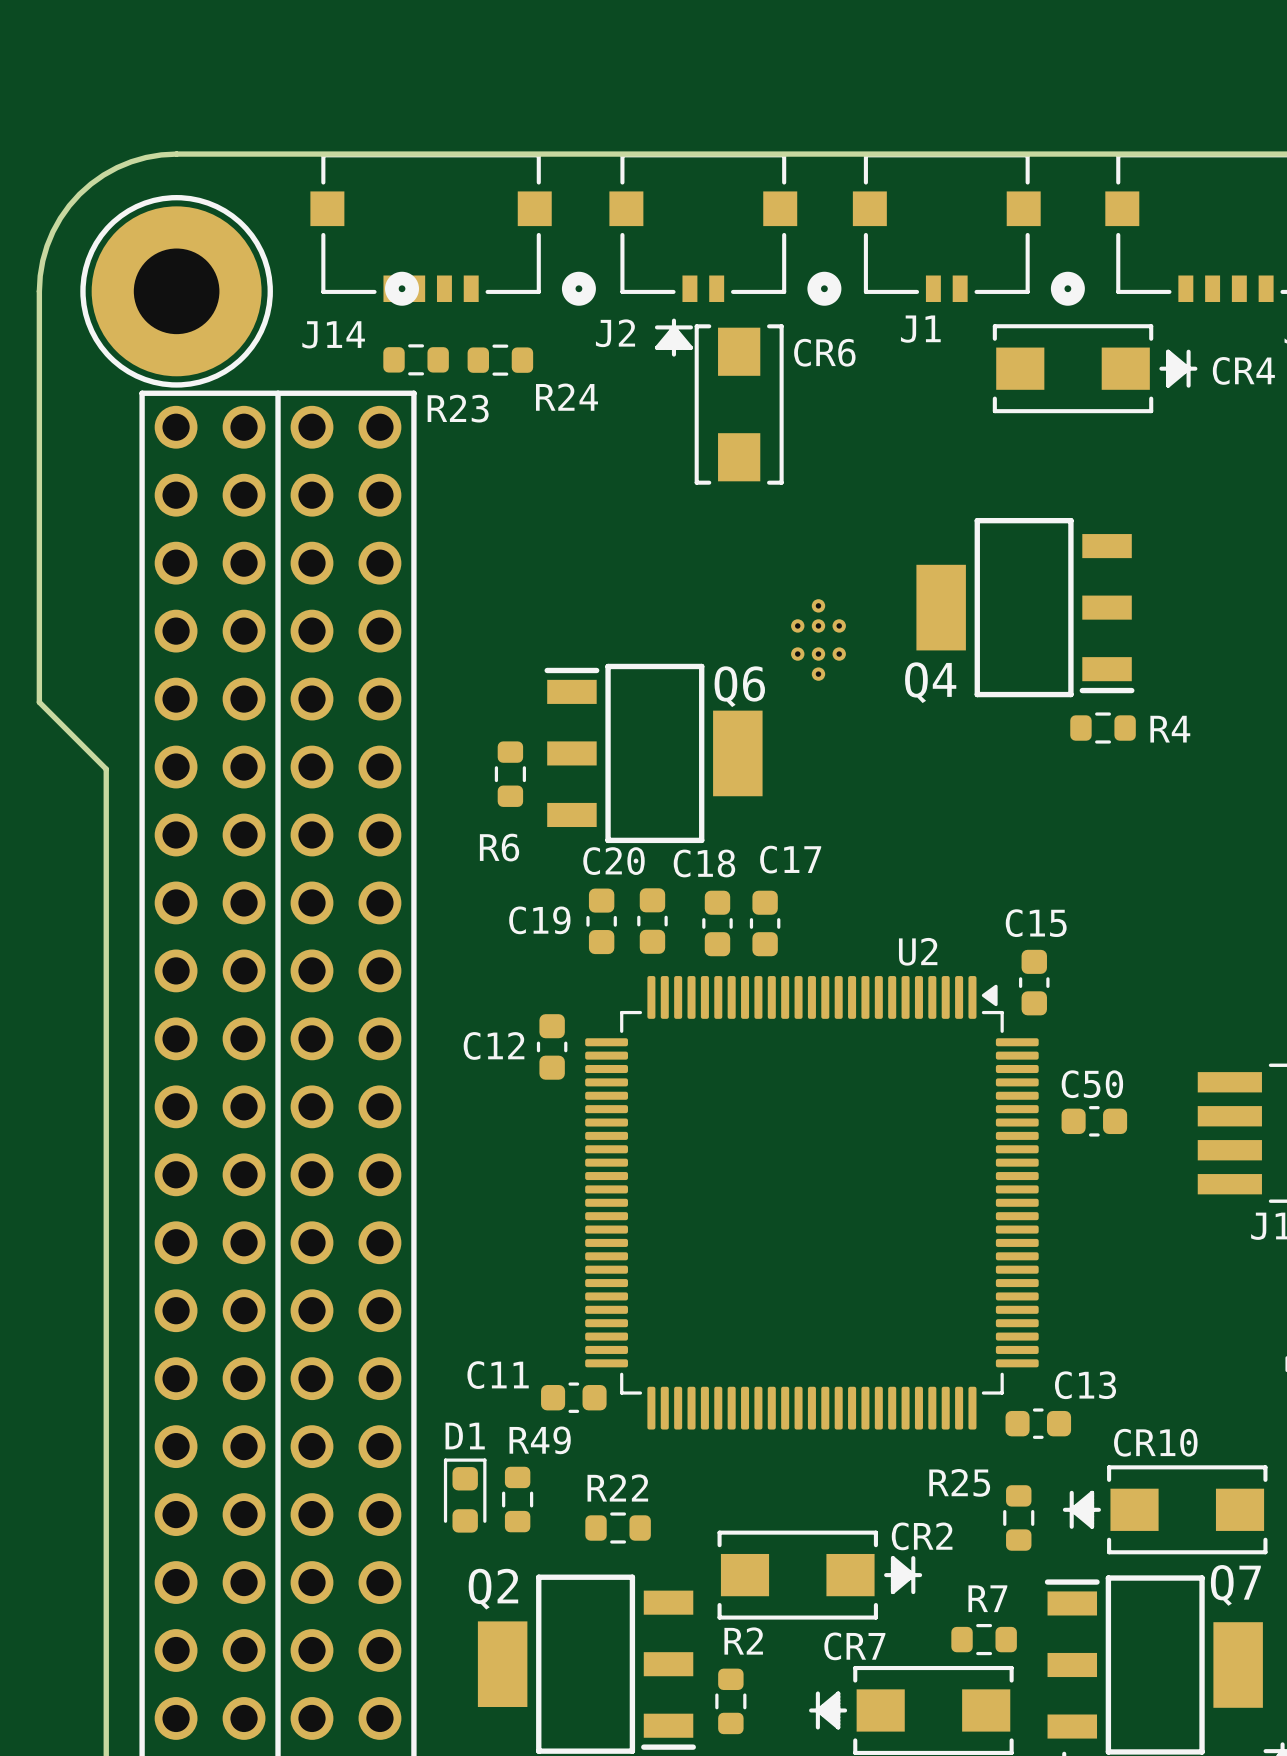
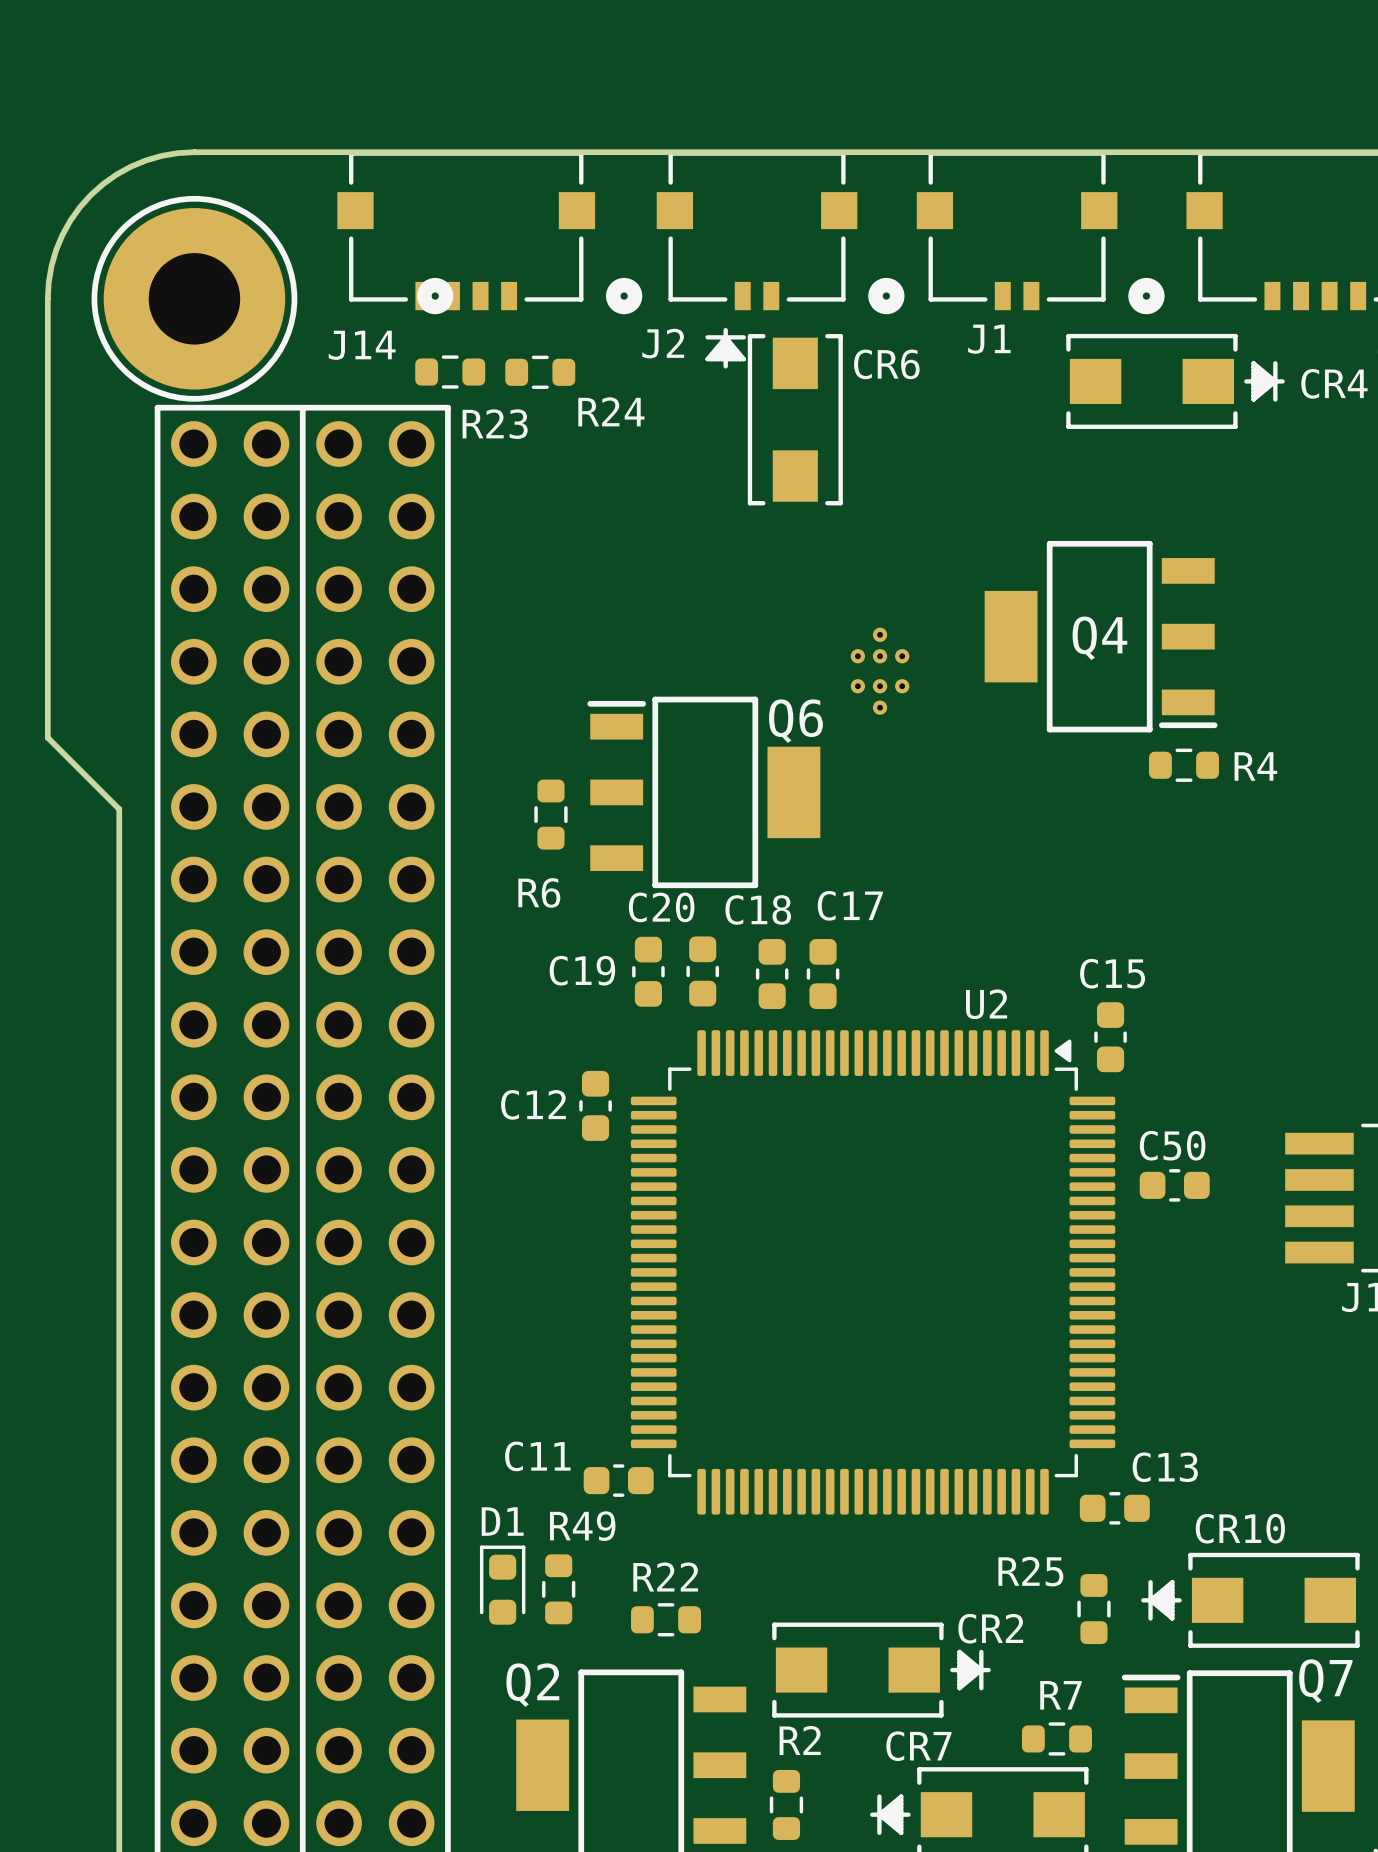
Q4 name position: Q4 (930, 682) -> Q4 (1099, 638)

